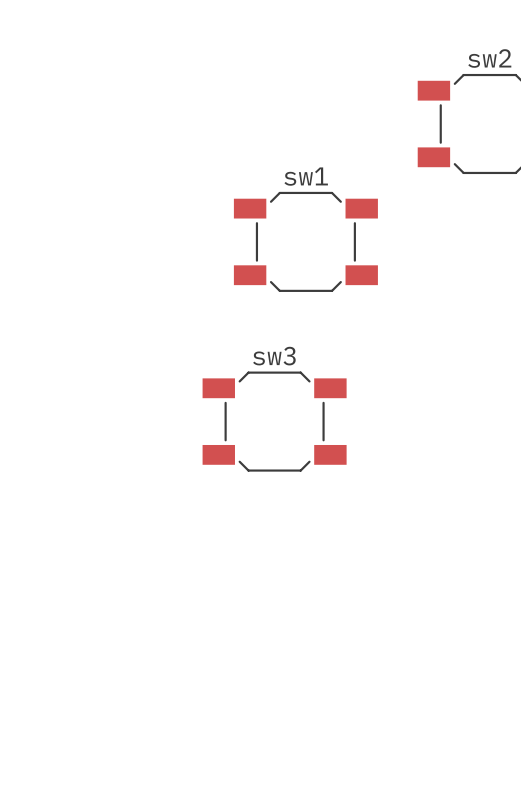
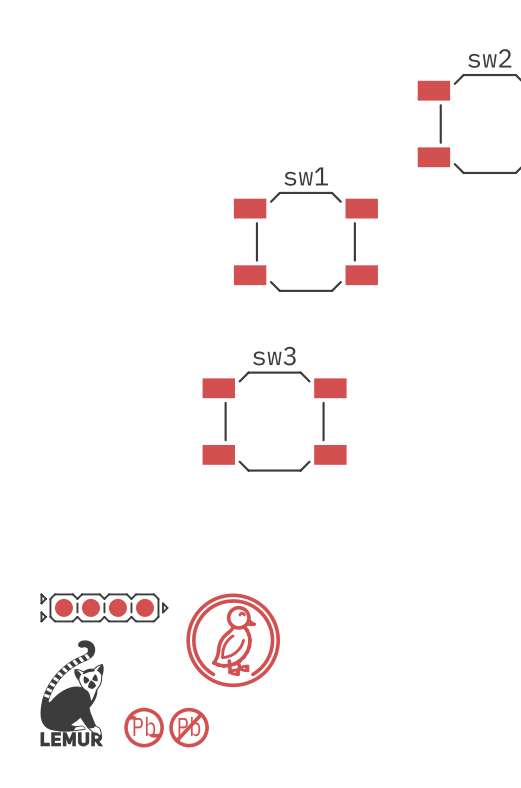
drawing: none -> [40, 593, 280, 748]

